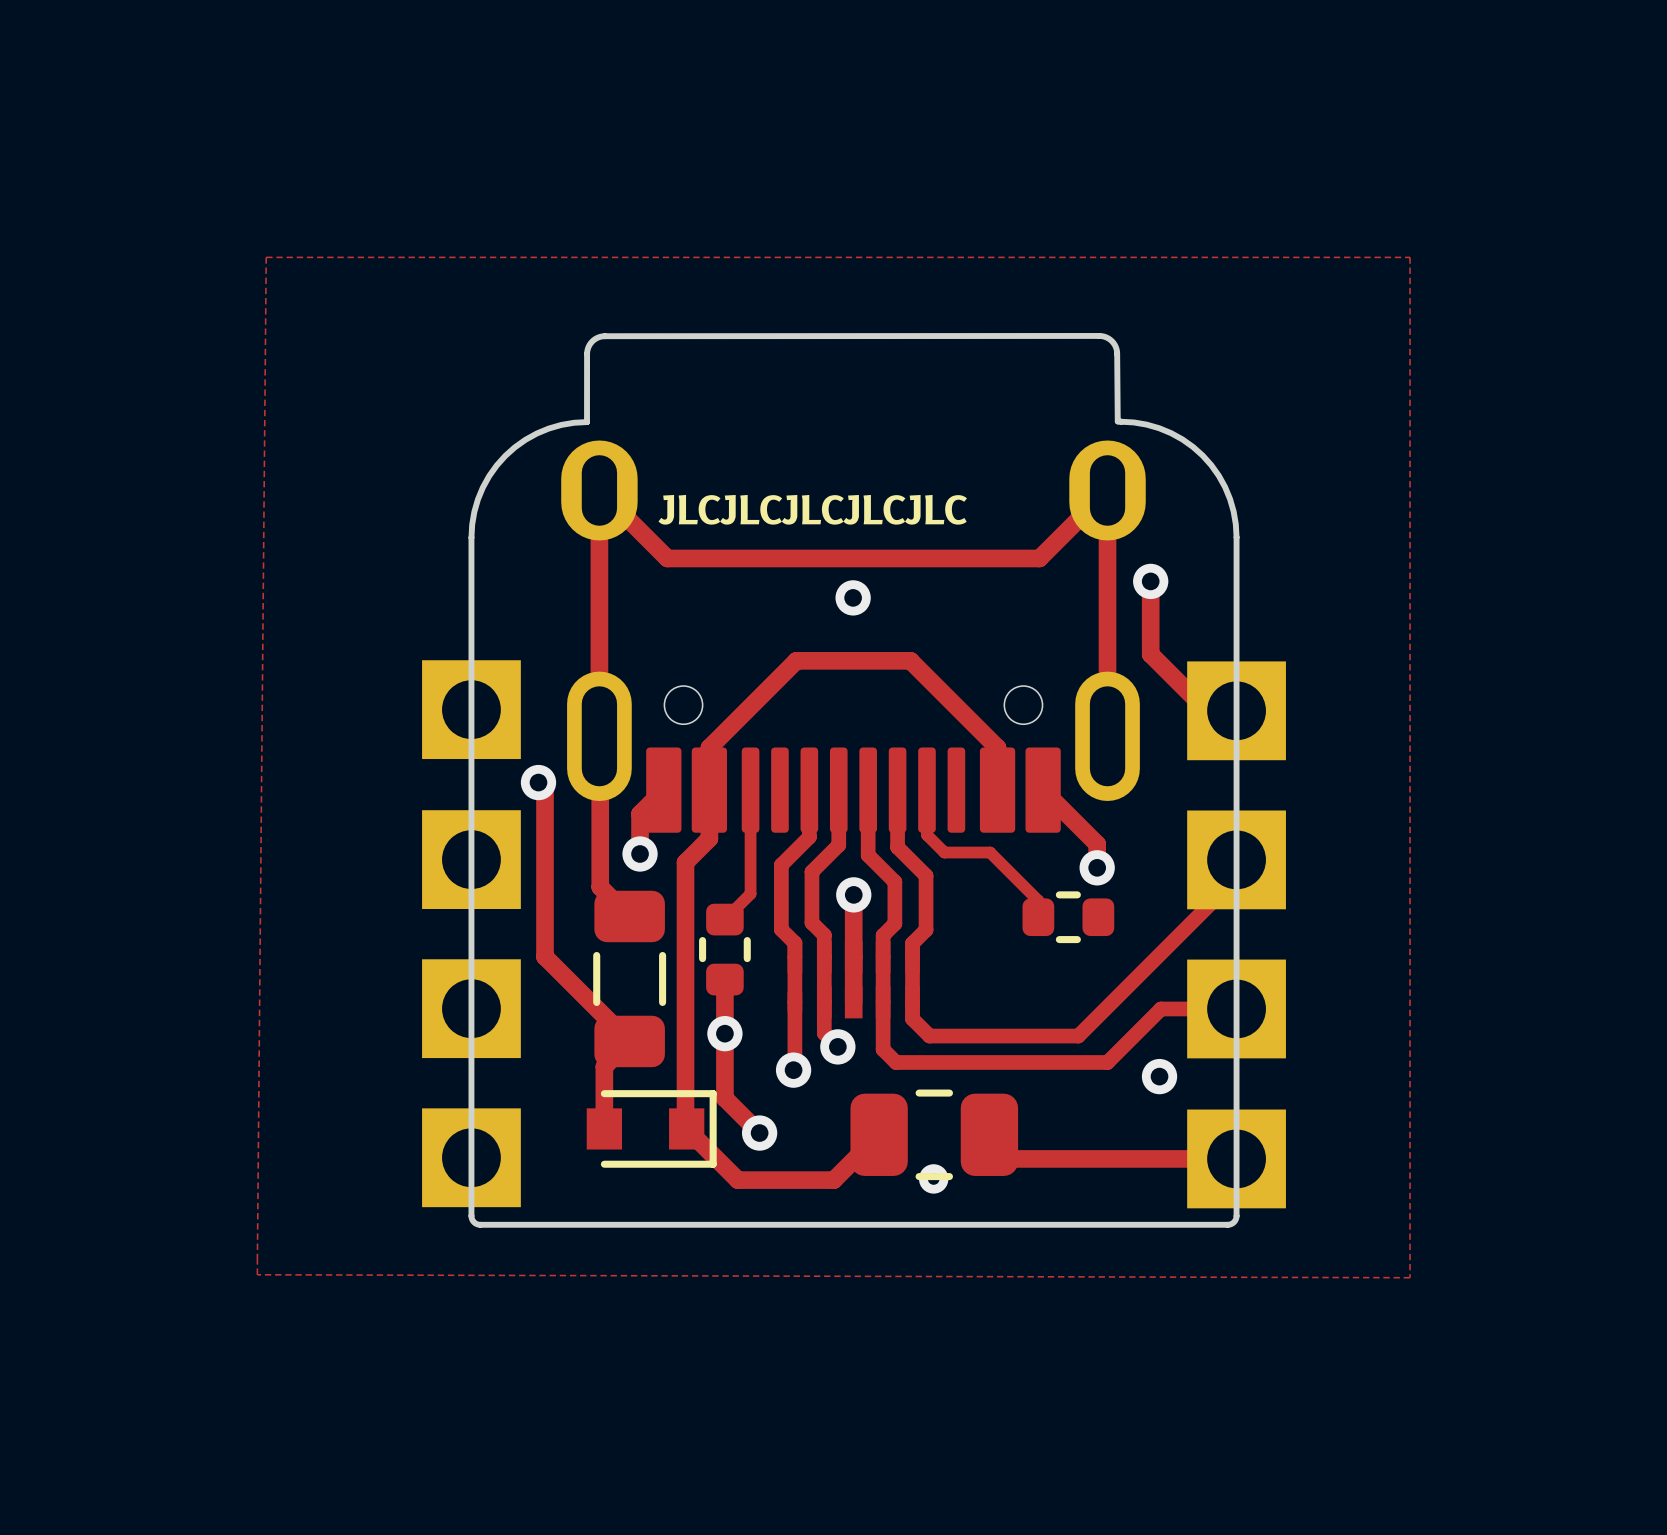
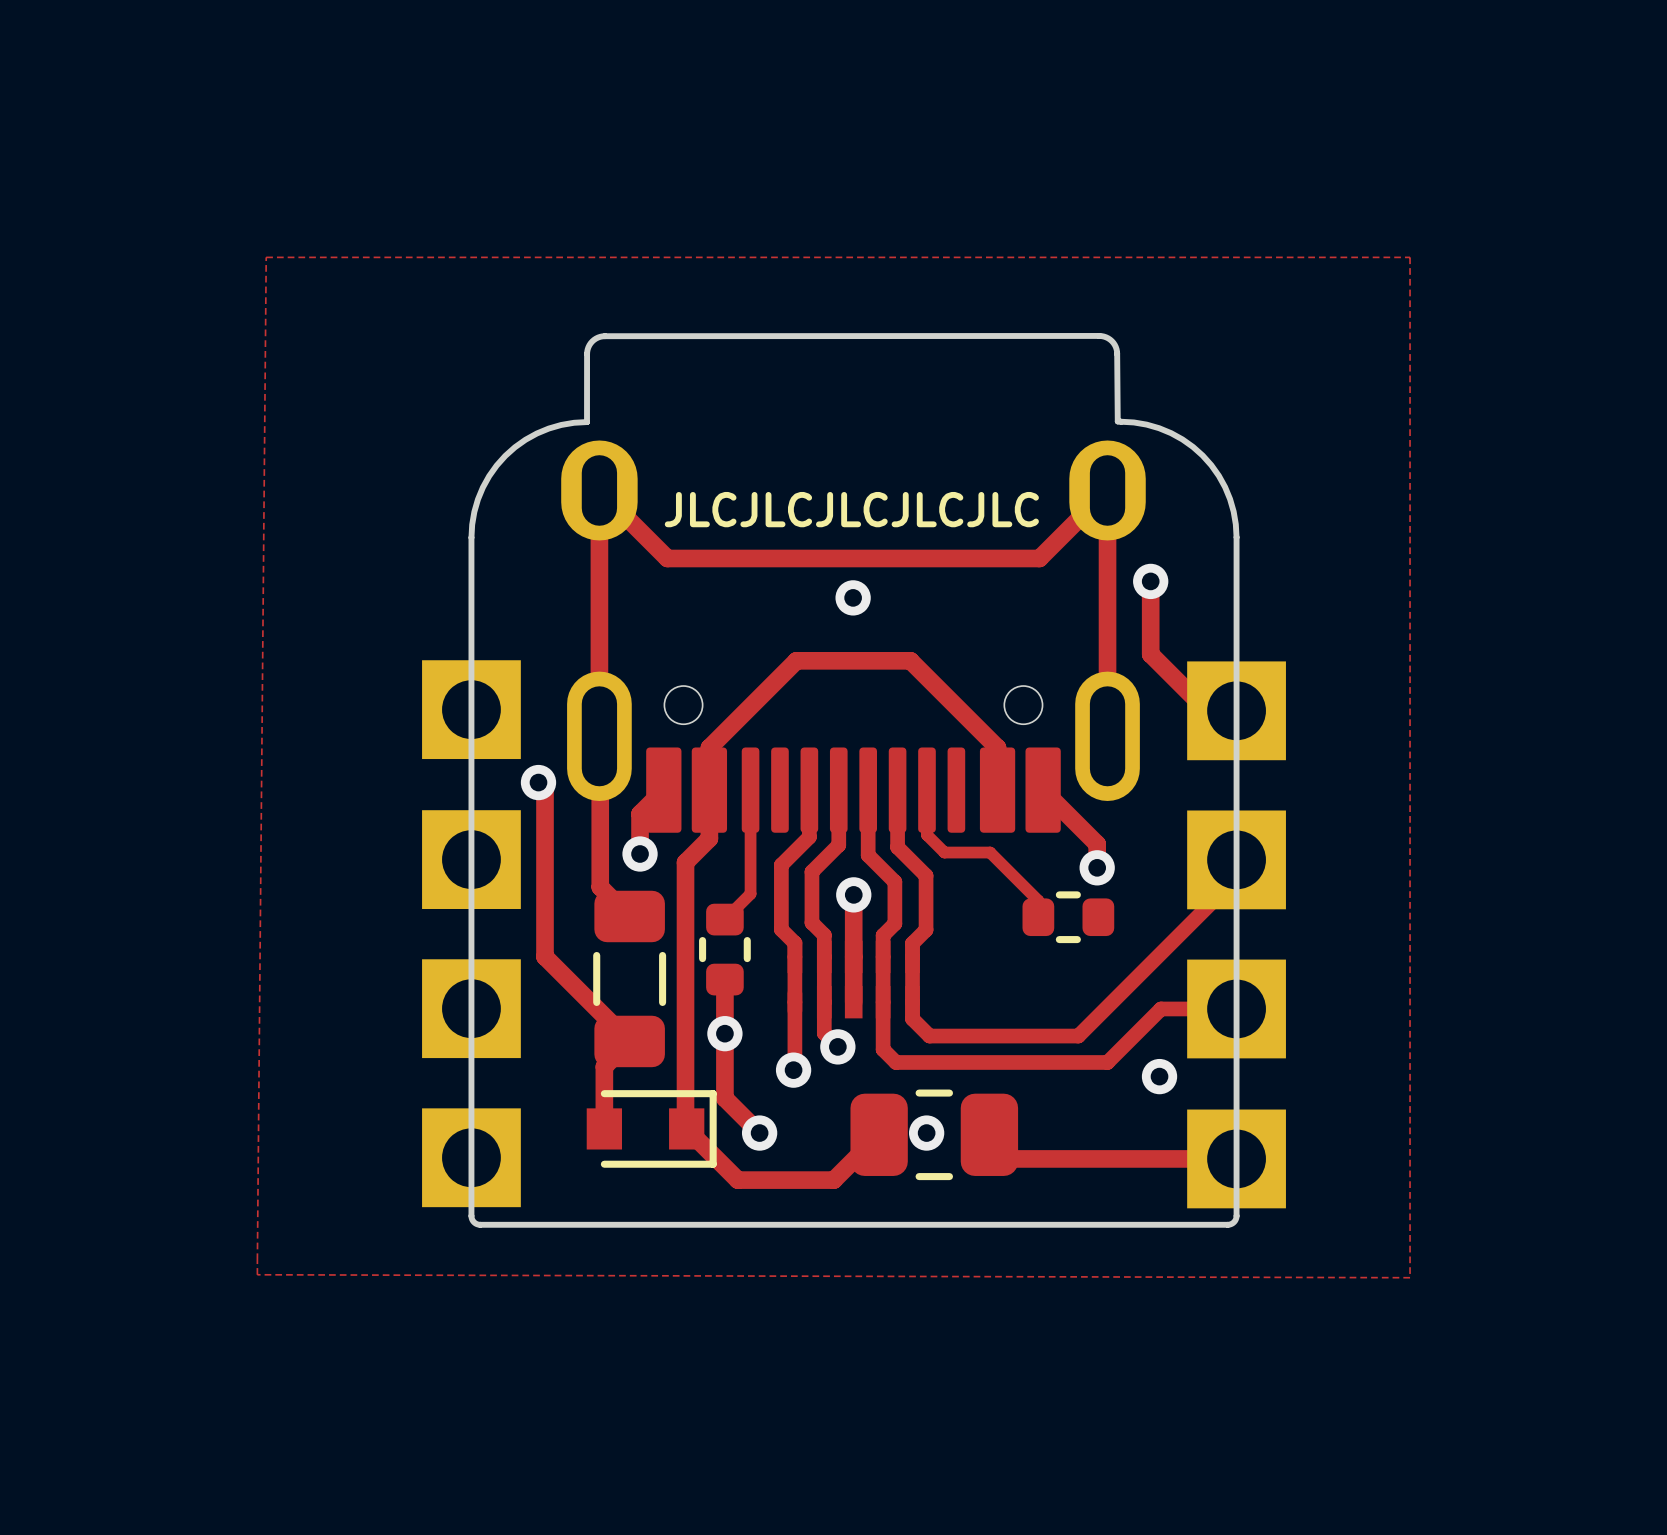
via: none -> (926, 1133)
via: (933, 1178) -> none

